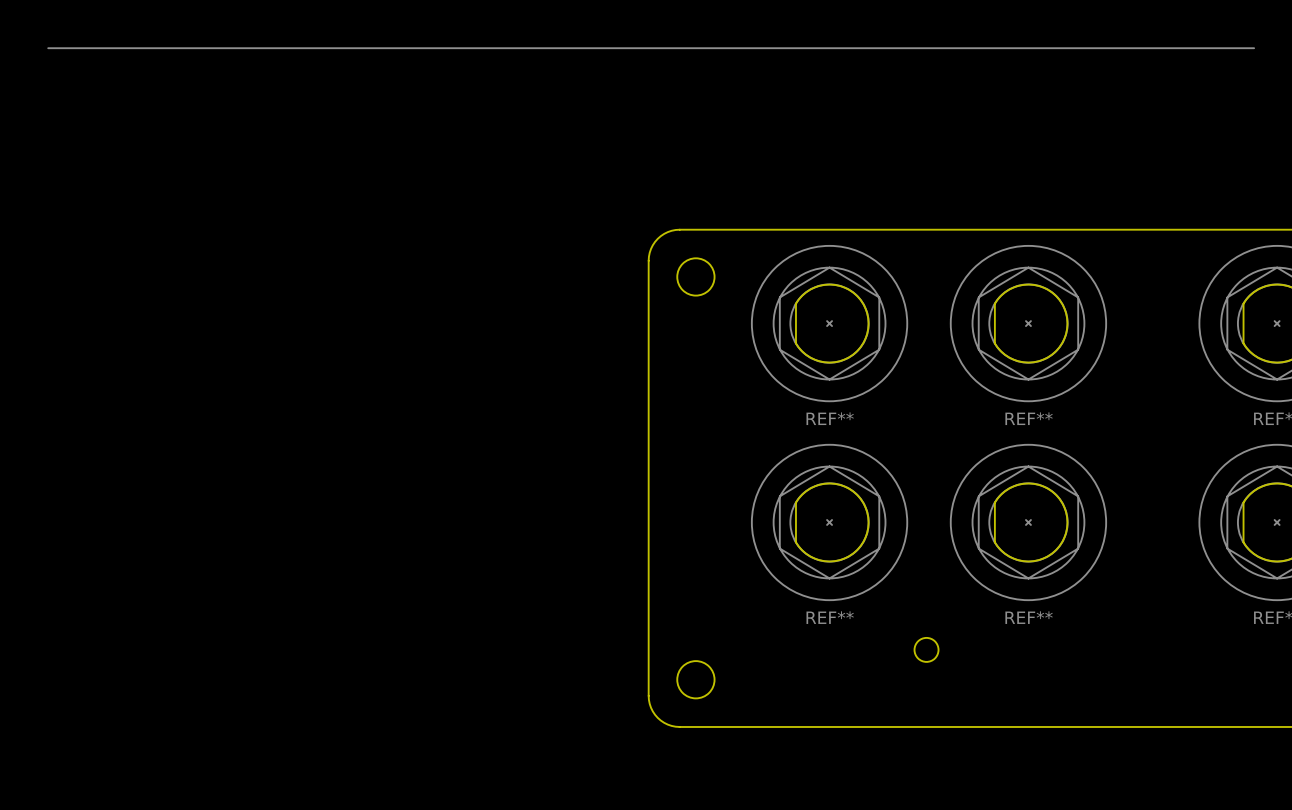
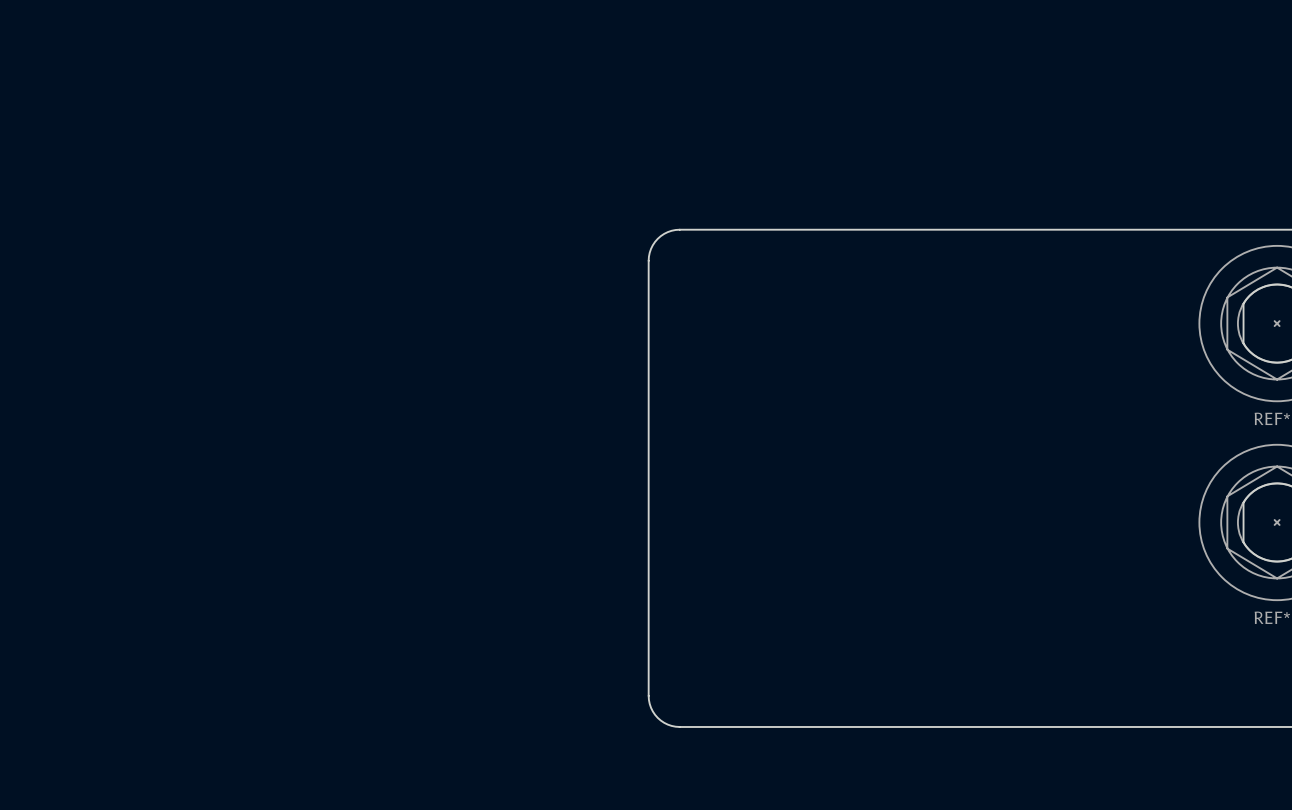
line: (48, 48) (1254, 48) -> none
round board edge: [676, 257, 716, 297] -> none
REF**: (829, 323) -> none
REF**: (1028, 323) -> none
REF**: (829, 522) -> none
REF**: (1028, 522) -> none
round board edge: [913, 636, 940, 663] -> none
round board edge: [676, 660, 716, 700] -> none

